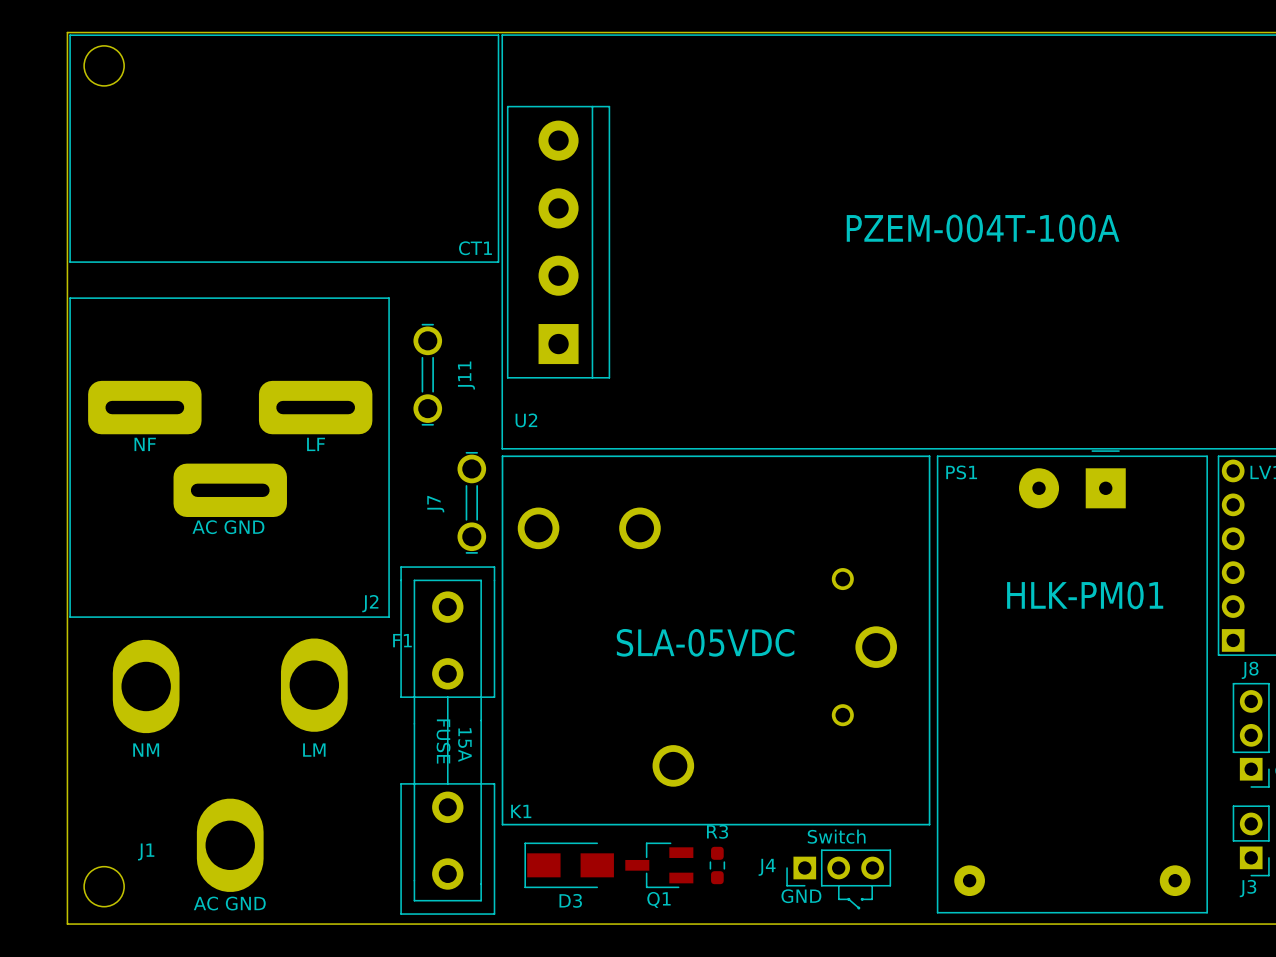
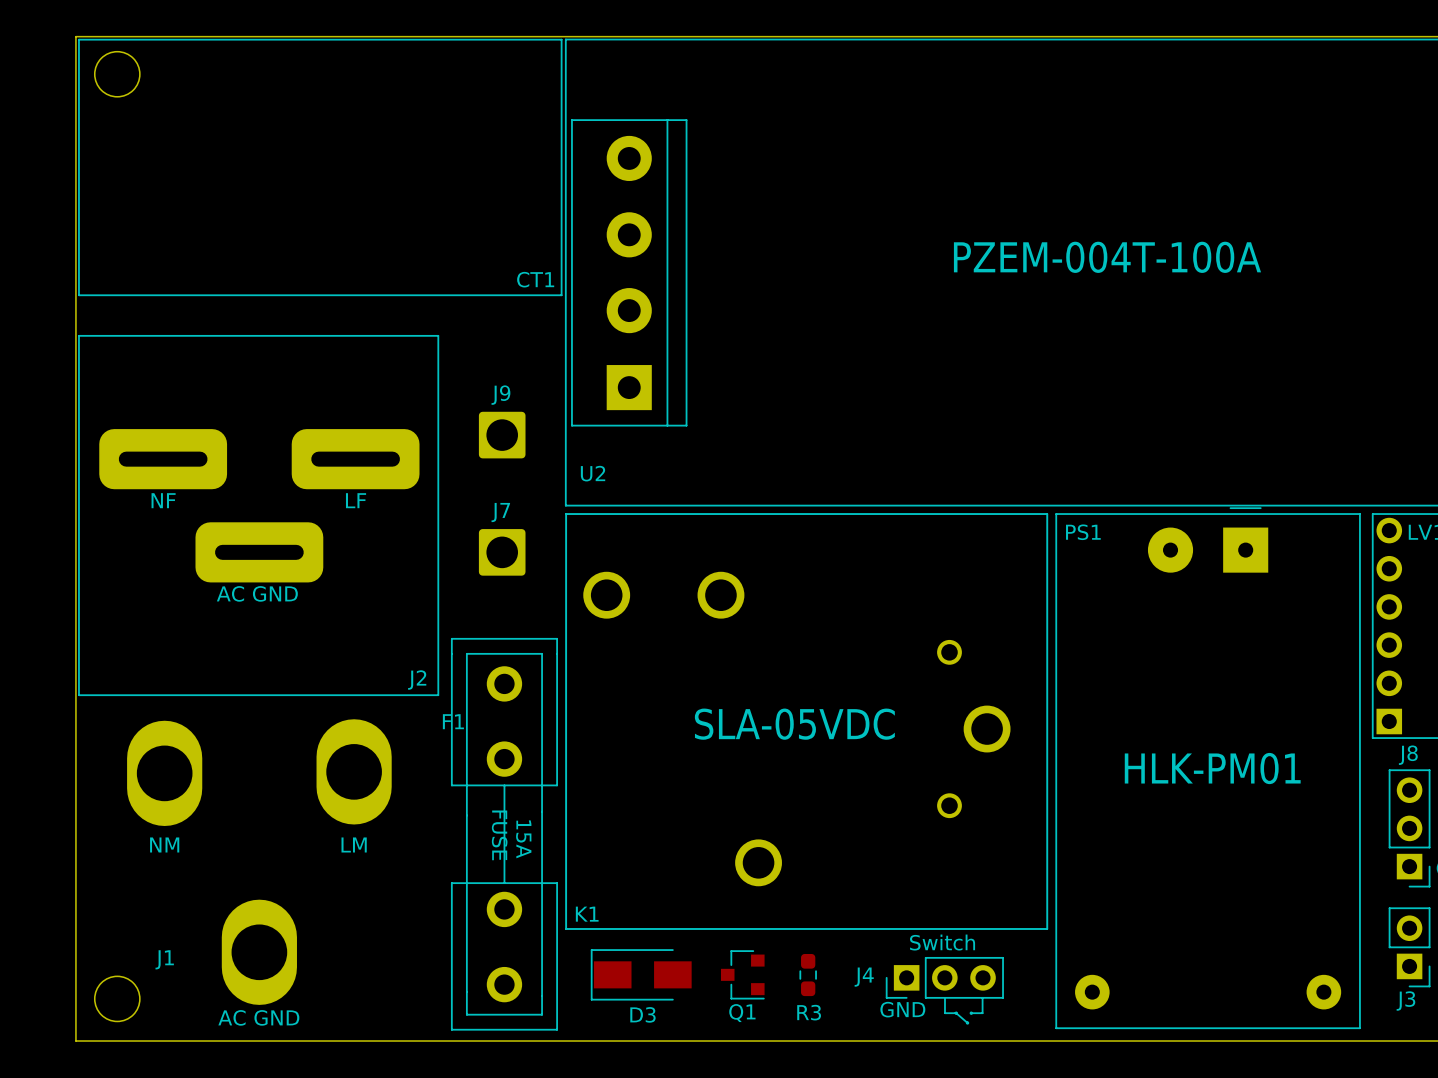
J11: (427, 374) -> none
J9: none -> (502, 435)
J7 footprint: [457, 451, 487, 554] -> [478, 529, 526, 576]
J7 name position: J7 (435, 504) -> J7 (500, 512)
text position: HLK-PM01 (1085, 595) -> HLK-PM01 (1212, 768)
R3 name position: R3 (717, 831) -> R3 (809, 1012)
Q1 footprint: [625, 842, 694, 889] -> [720, 950, 765, 1000]

